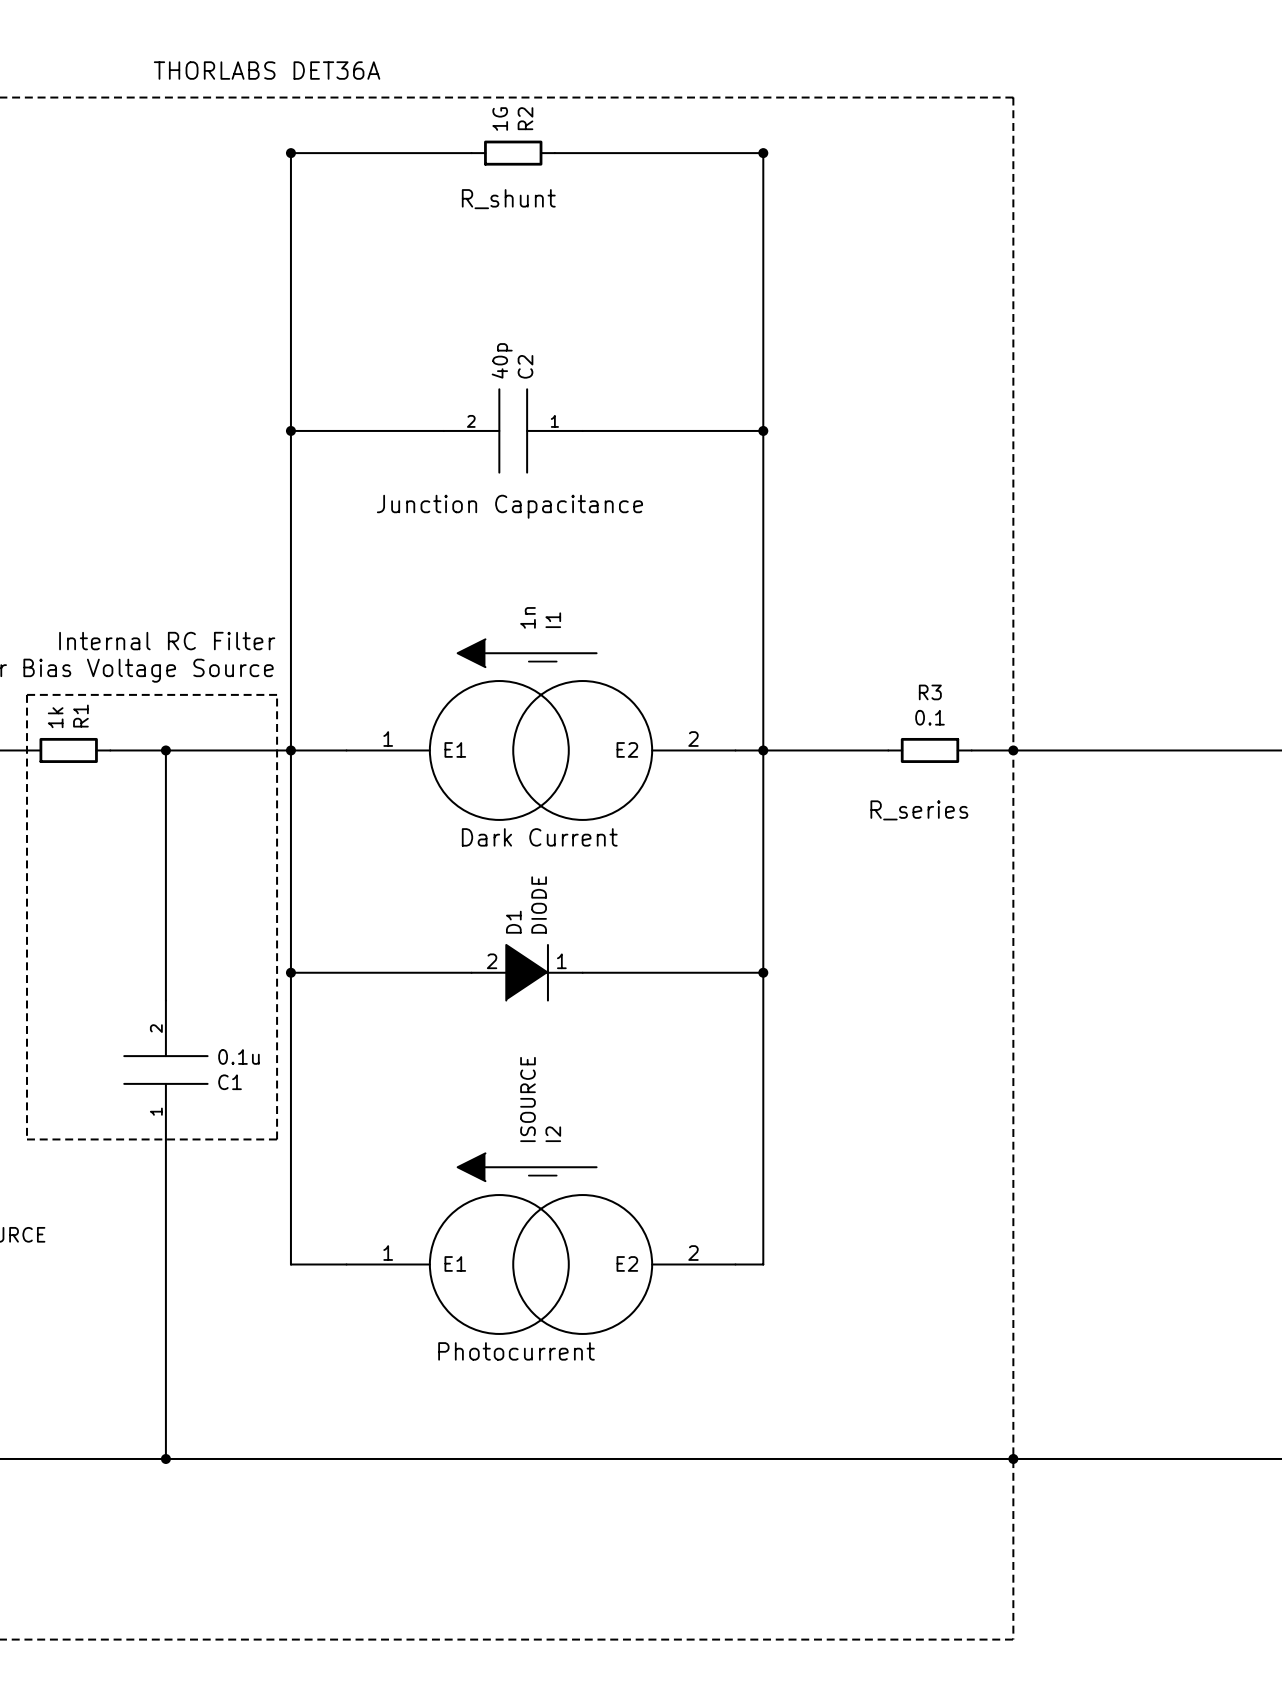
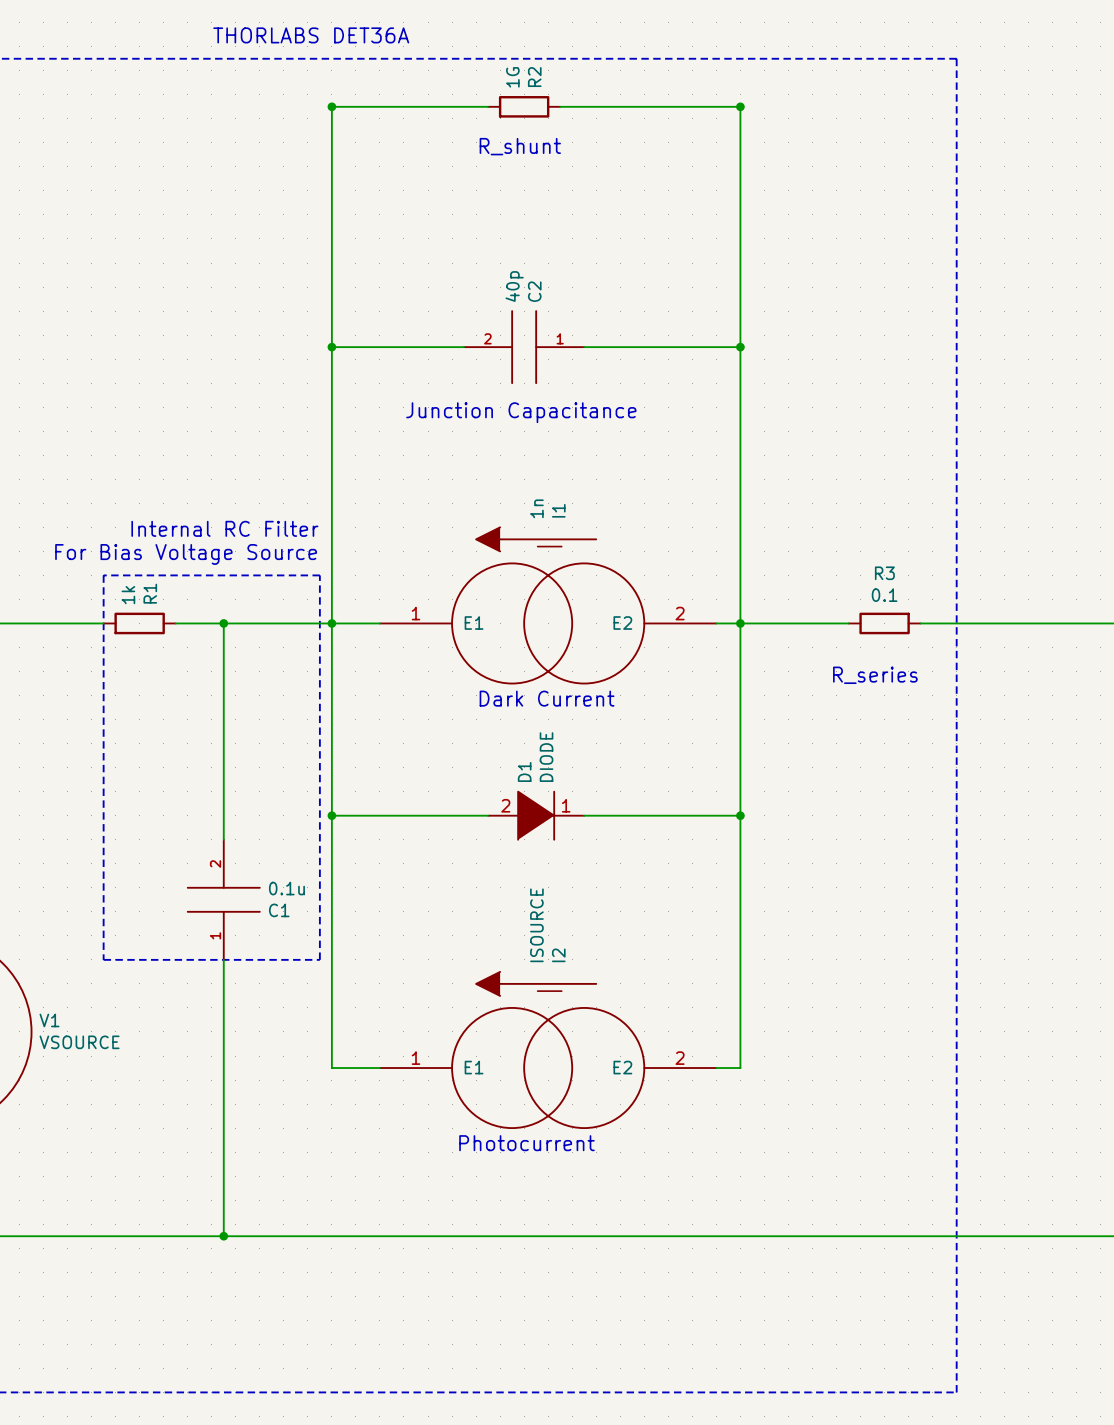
junction: (1013, 750) -> none
junction: (1013, 1458) -> none

